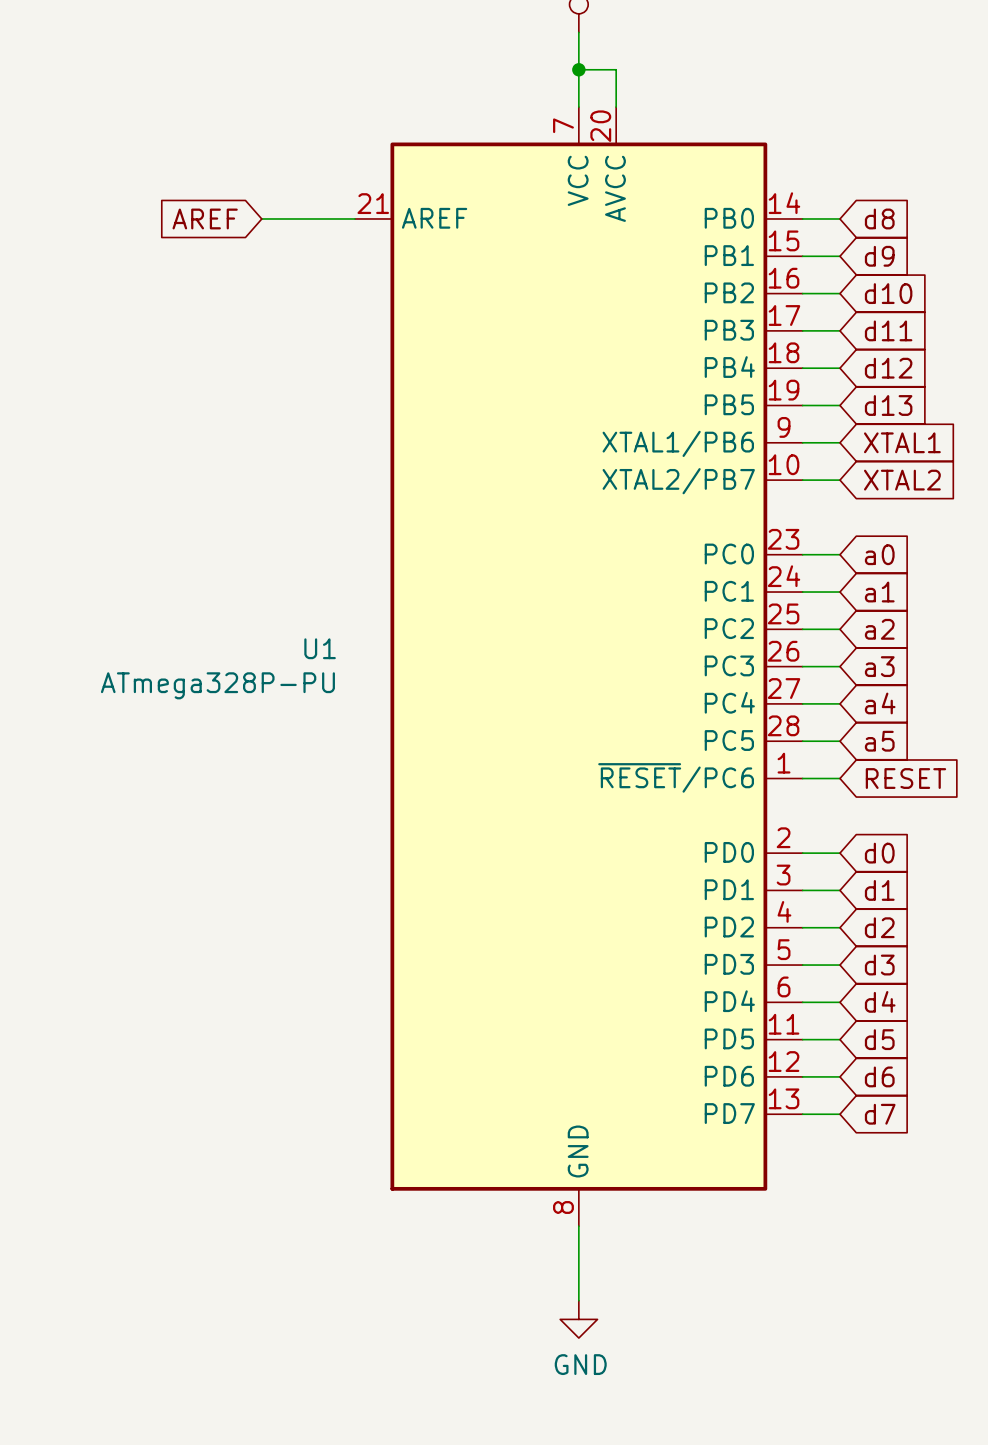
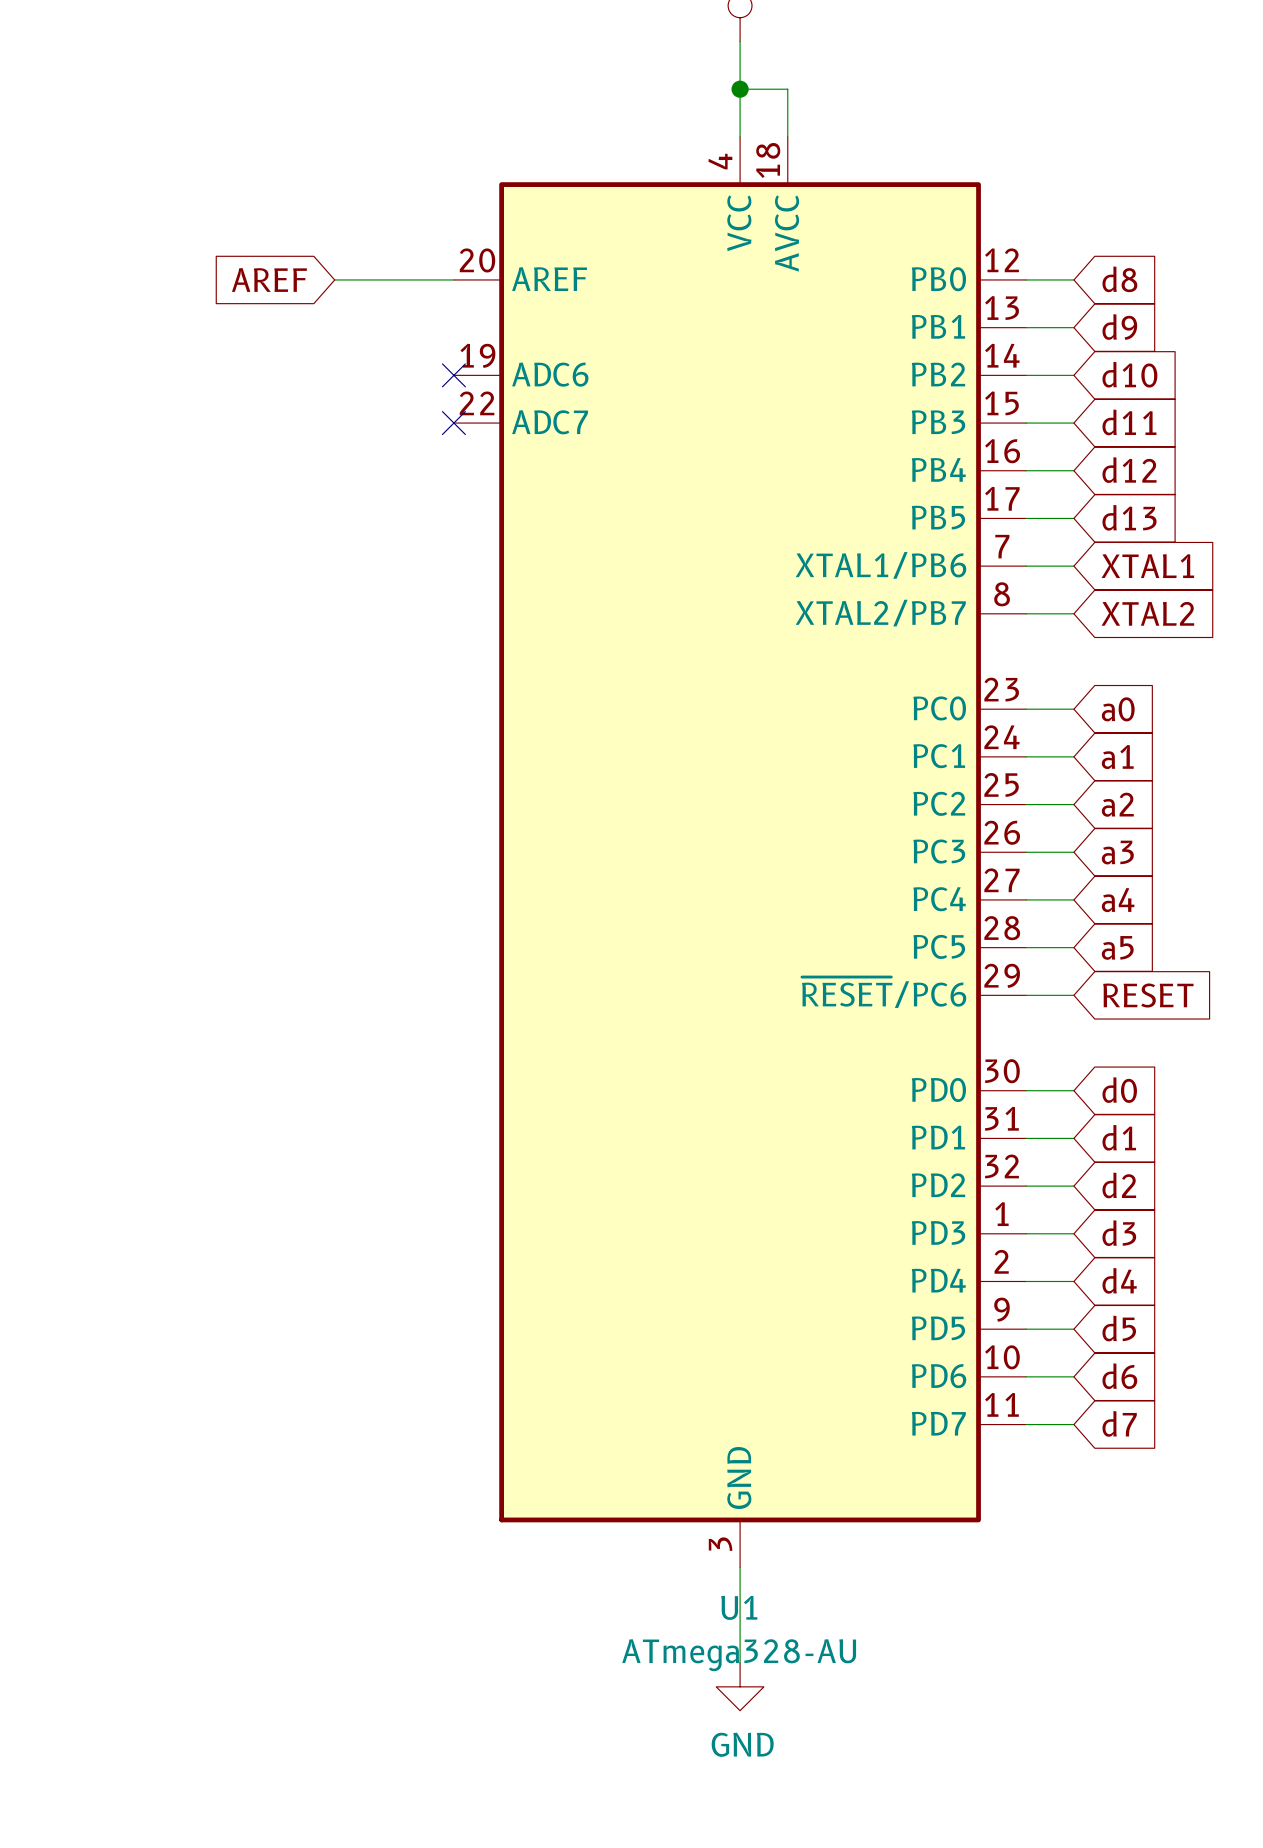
U1 symbol: [355, 107, 803, 1227] -> [453, 136, 1027, 1568]
no-connect mark: none -> (453, 375)
no-connect mark: none -> (453, 423)
U1 name position: U1 (320, 648) -> U1 (739, 1607)
U1 value: ATmega328P-PU (217, 685) -> ATmega328-AU (739, 1655)

